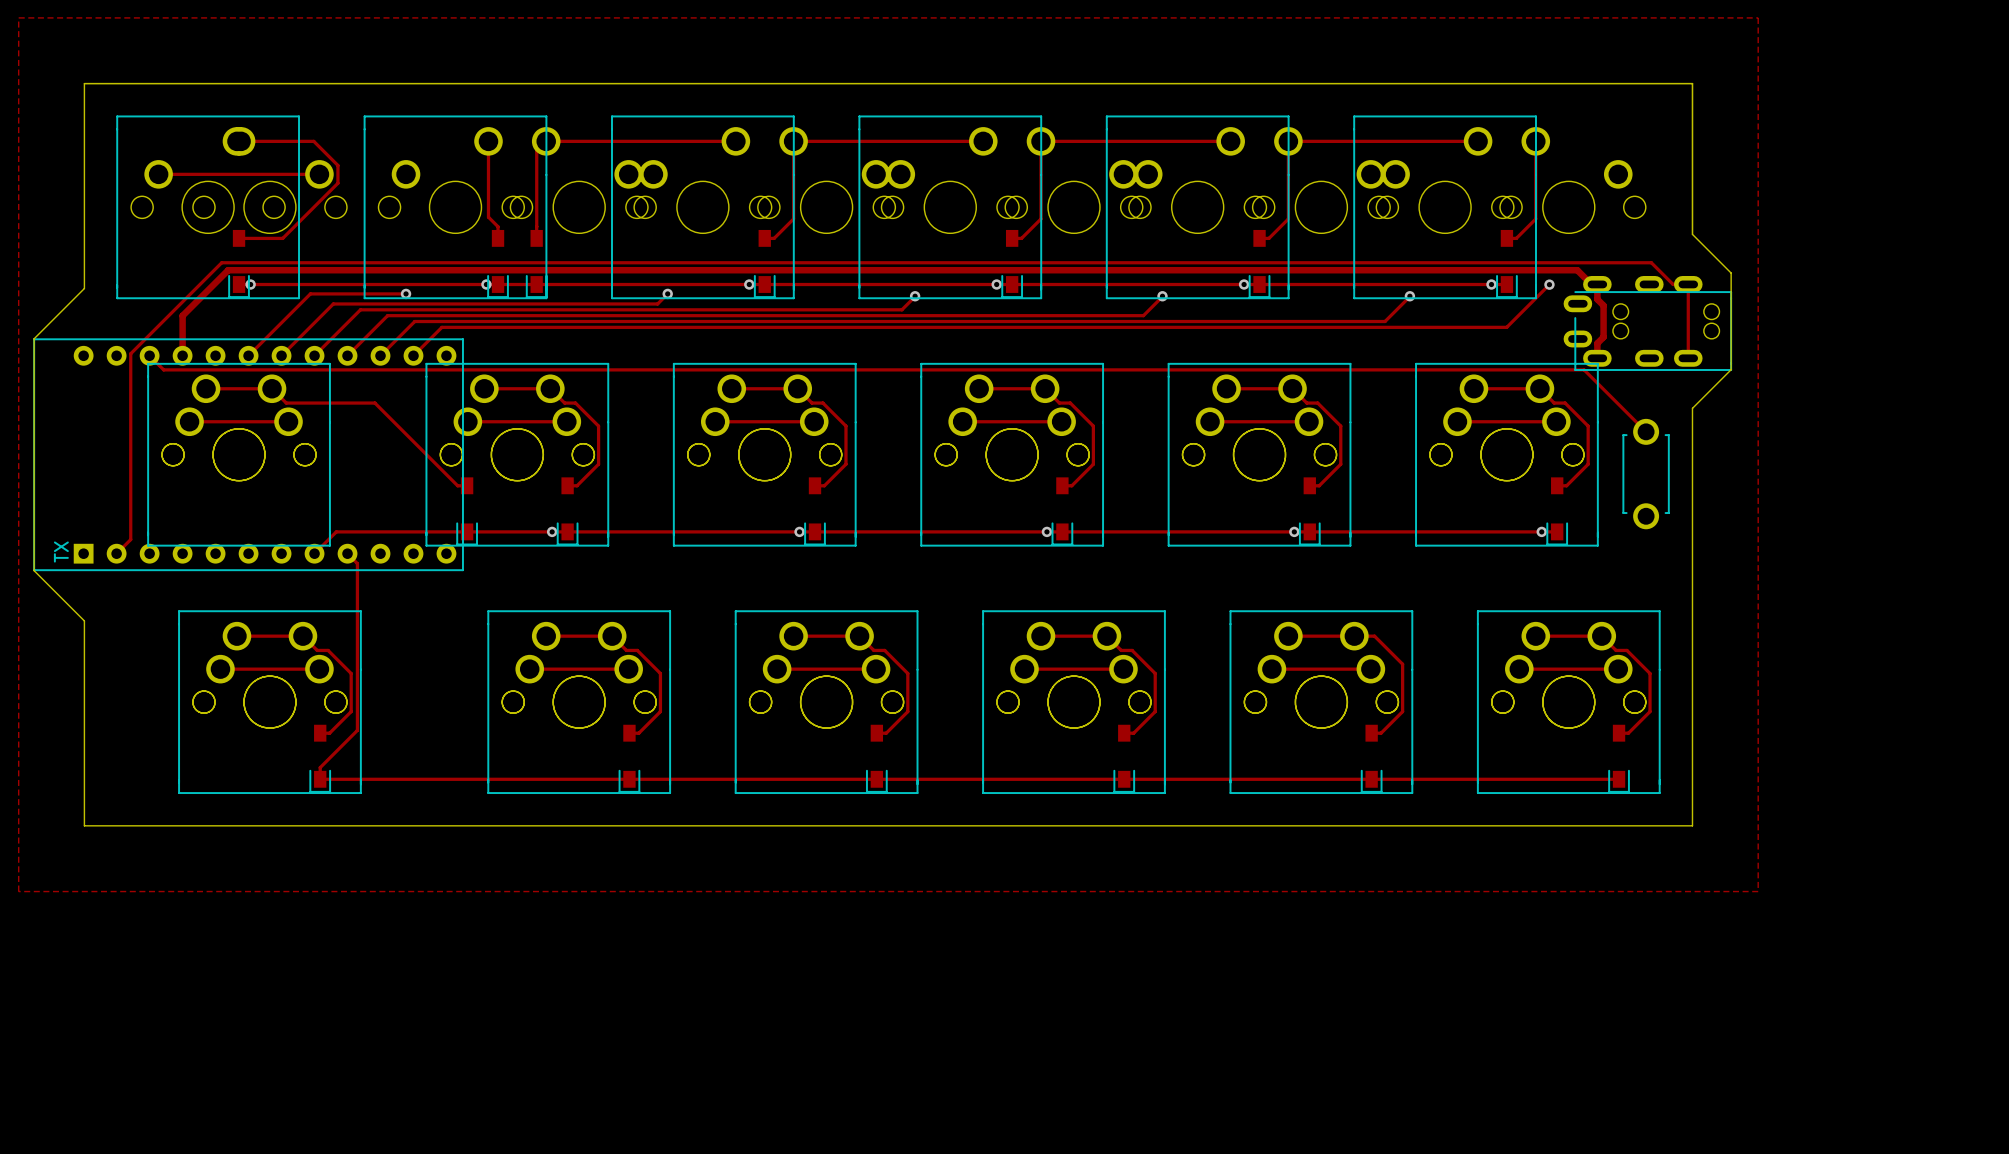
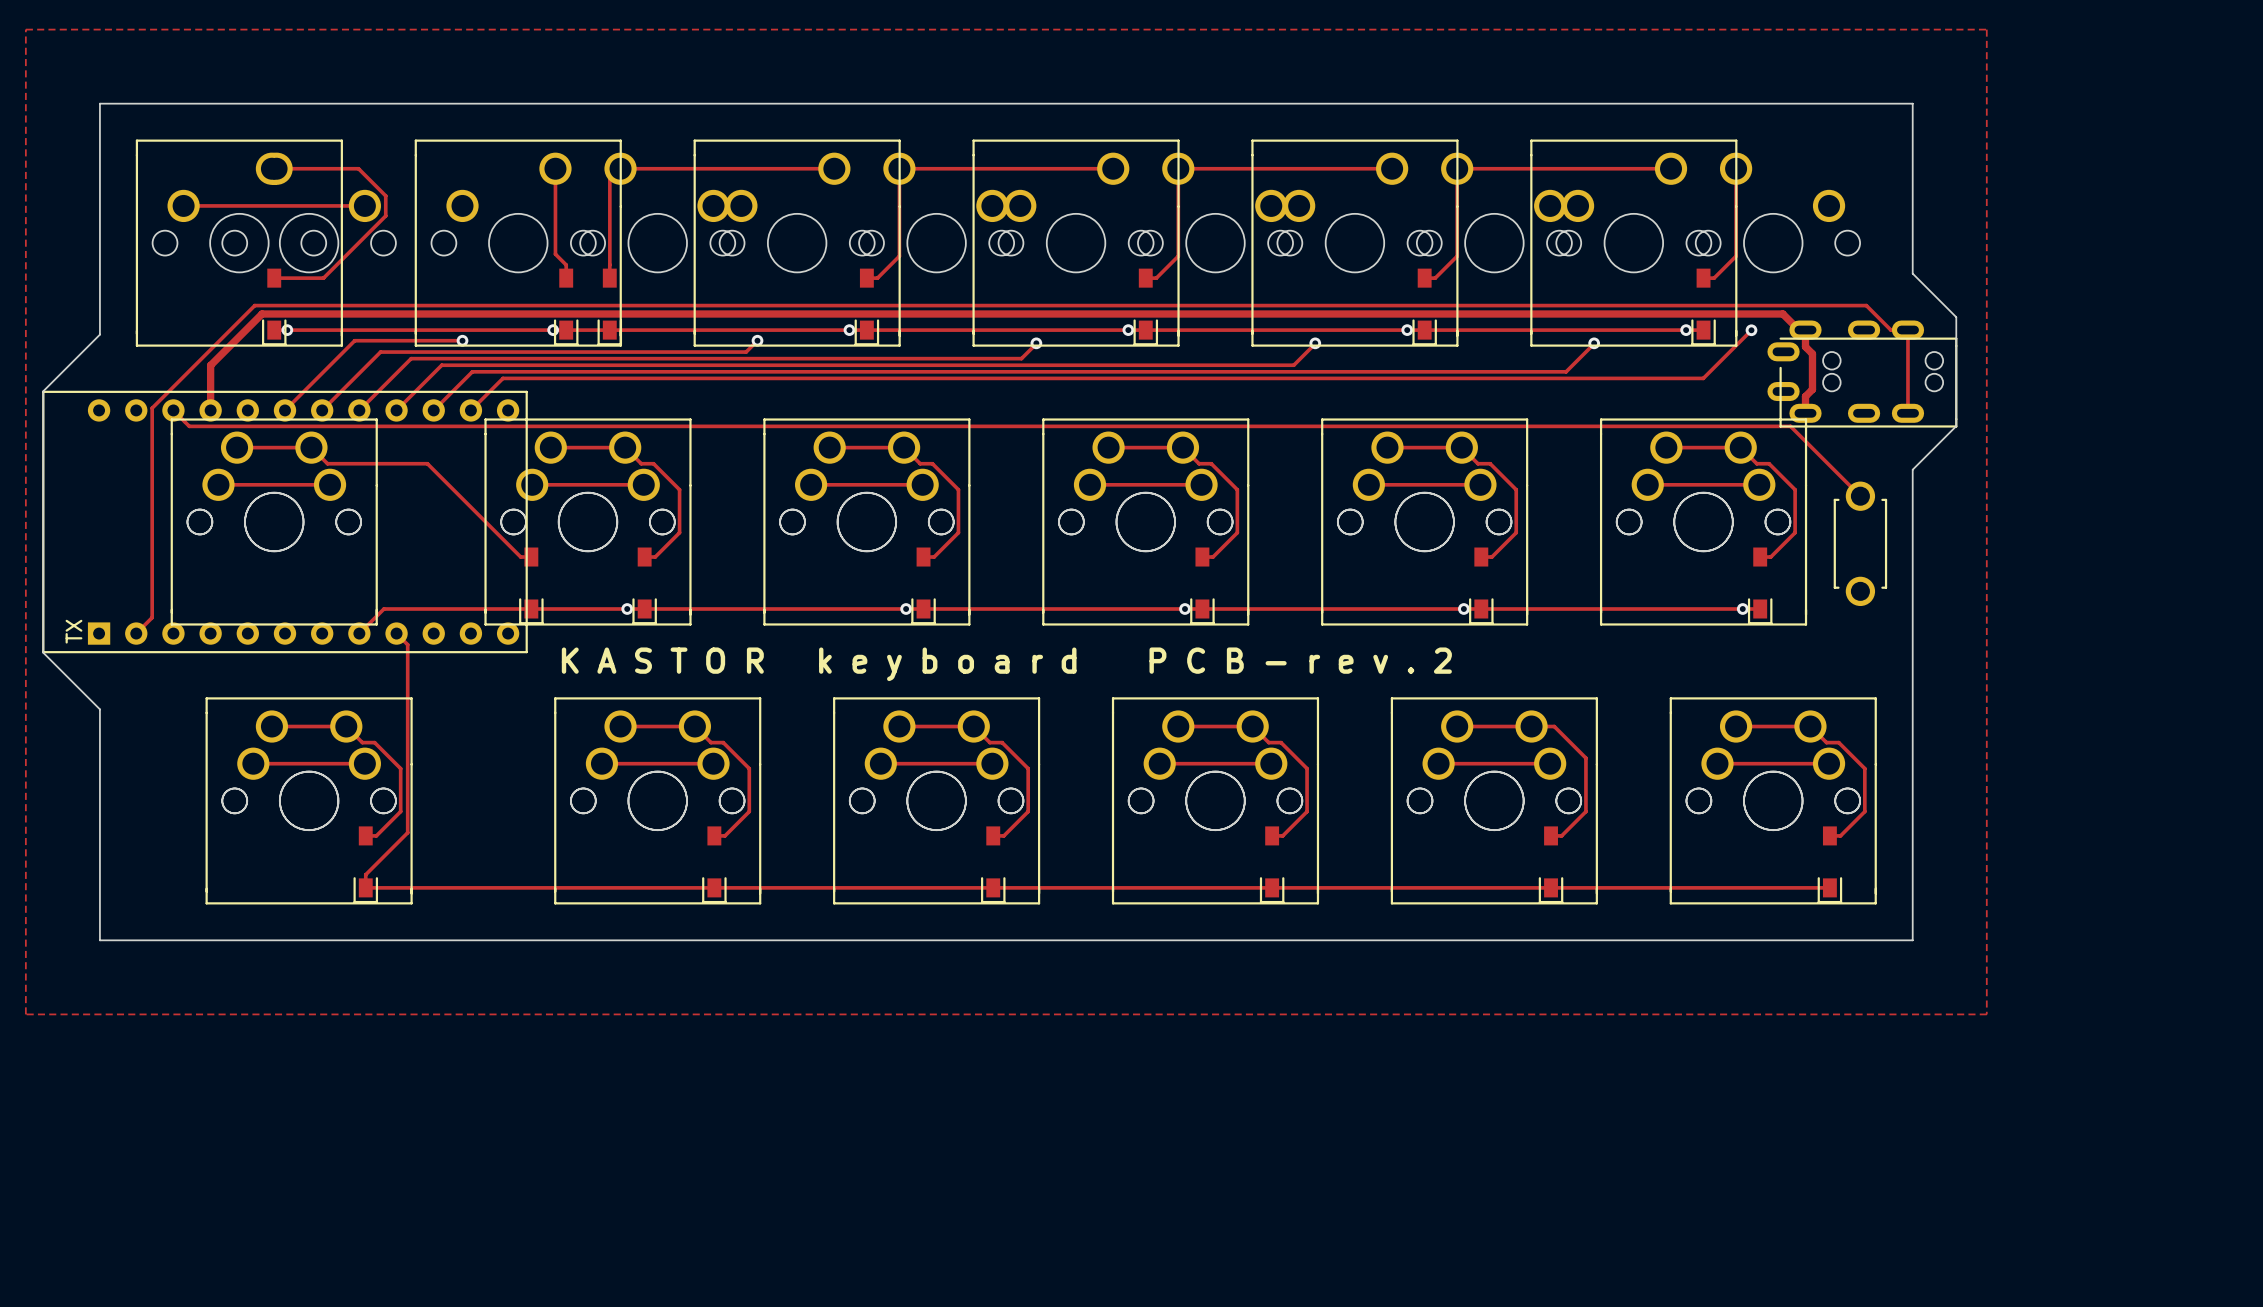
text: none -> K A S T O R k e y b o a r d P C B - r e v . 2 (1006, 664)

